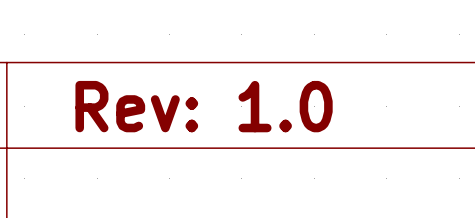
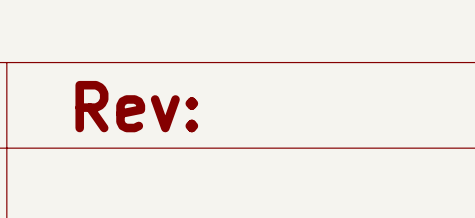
title block: Rev: 1.0 (204, 106) -> Rev: (136, 106)

